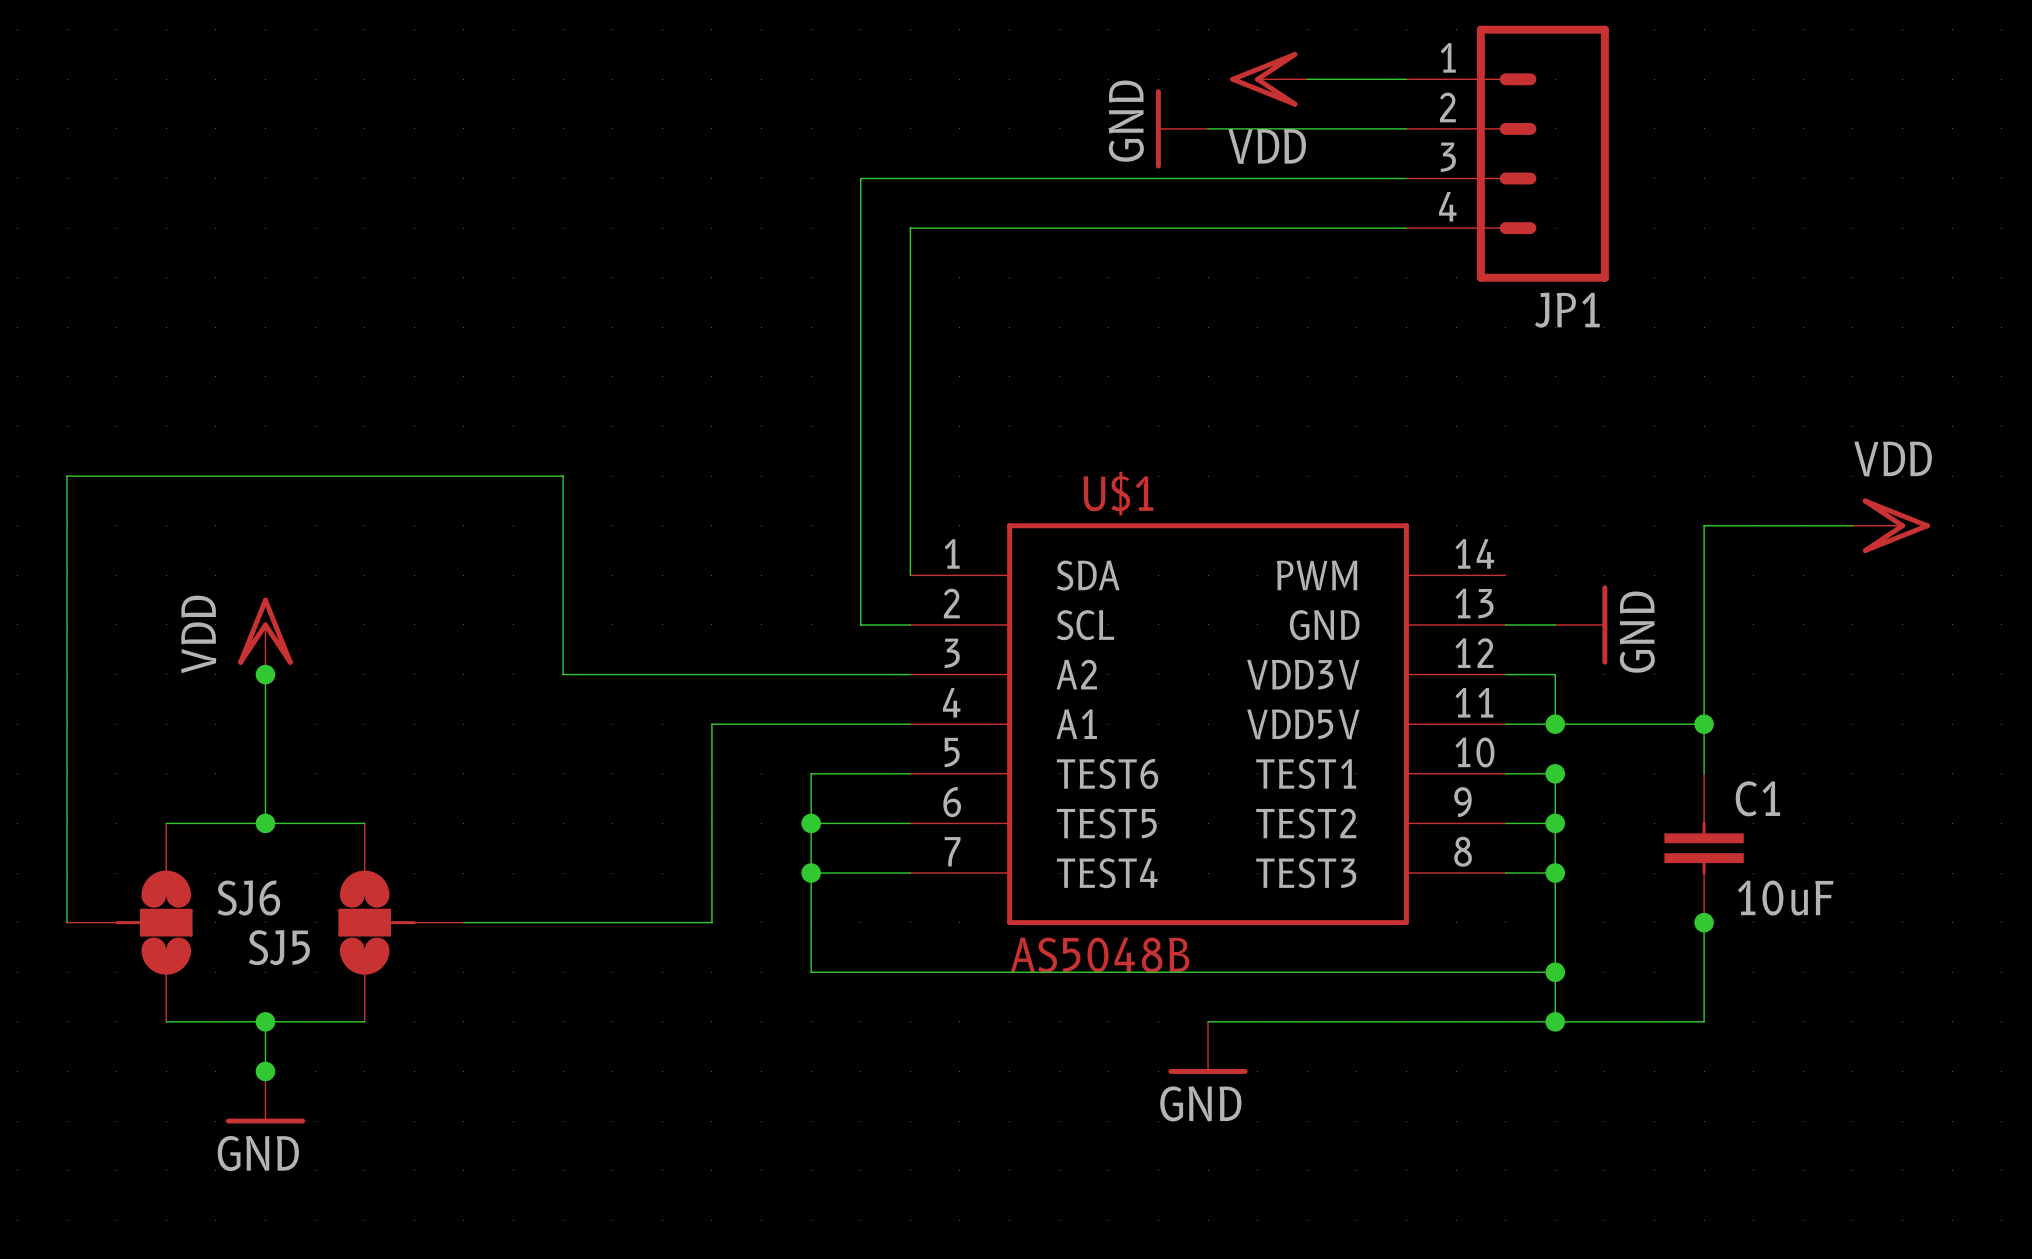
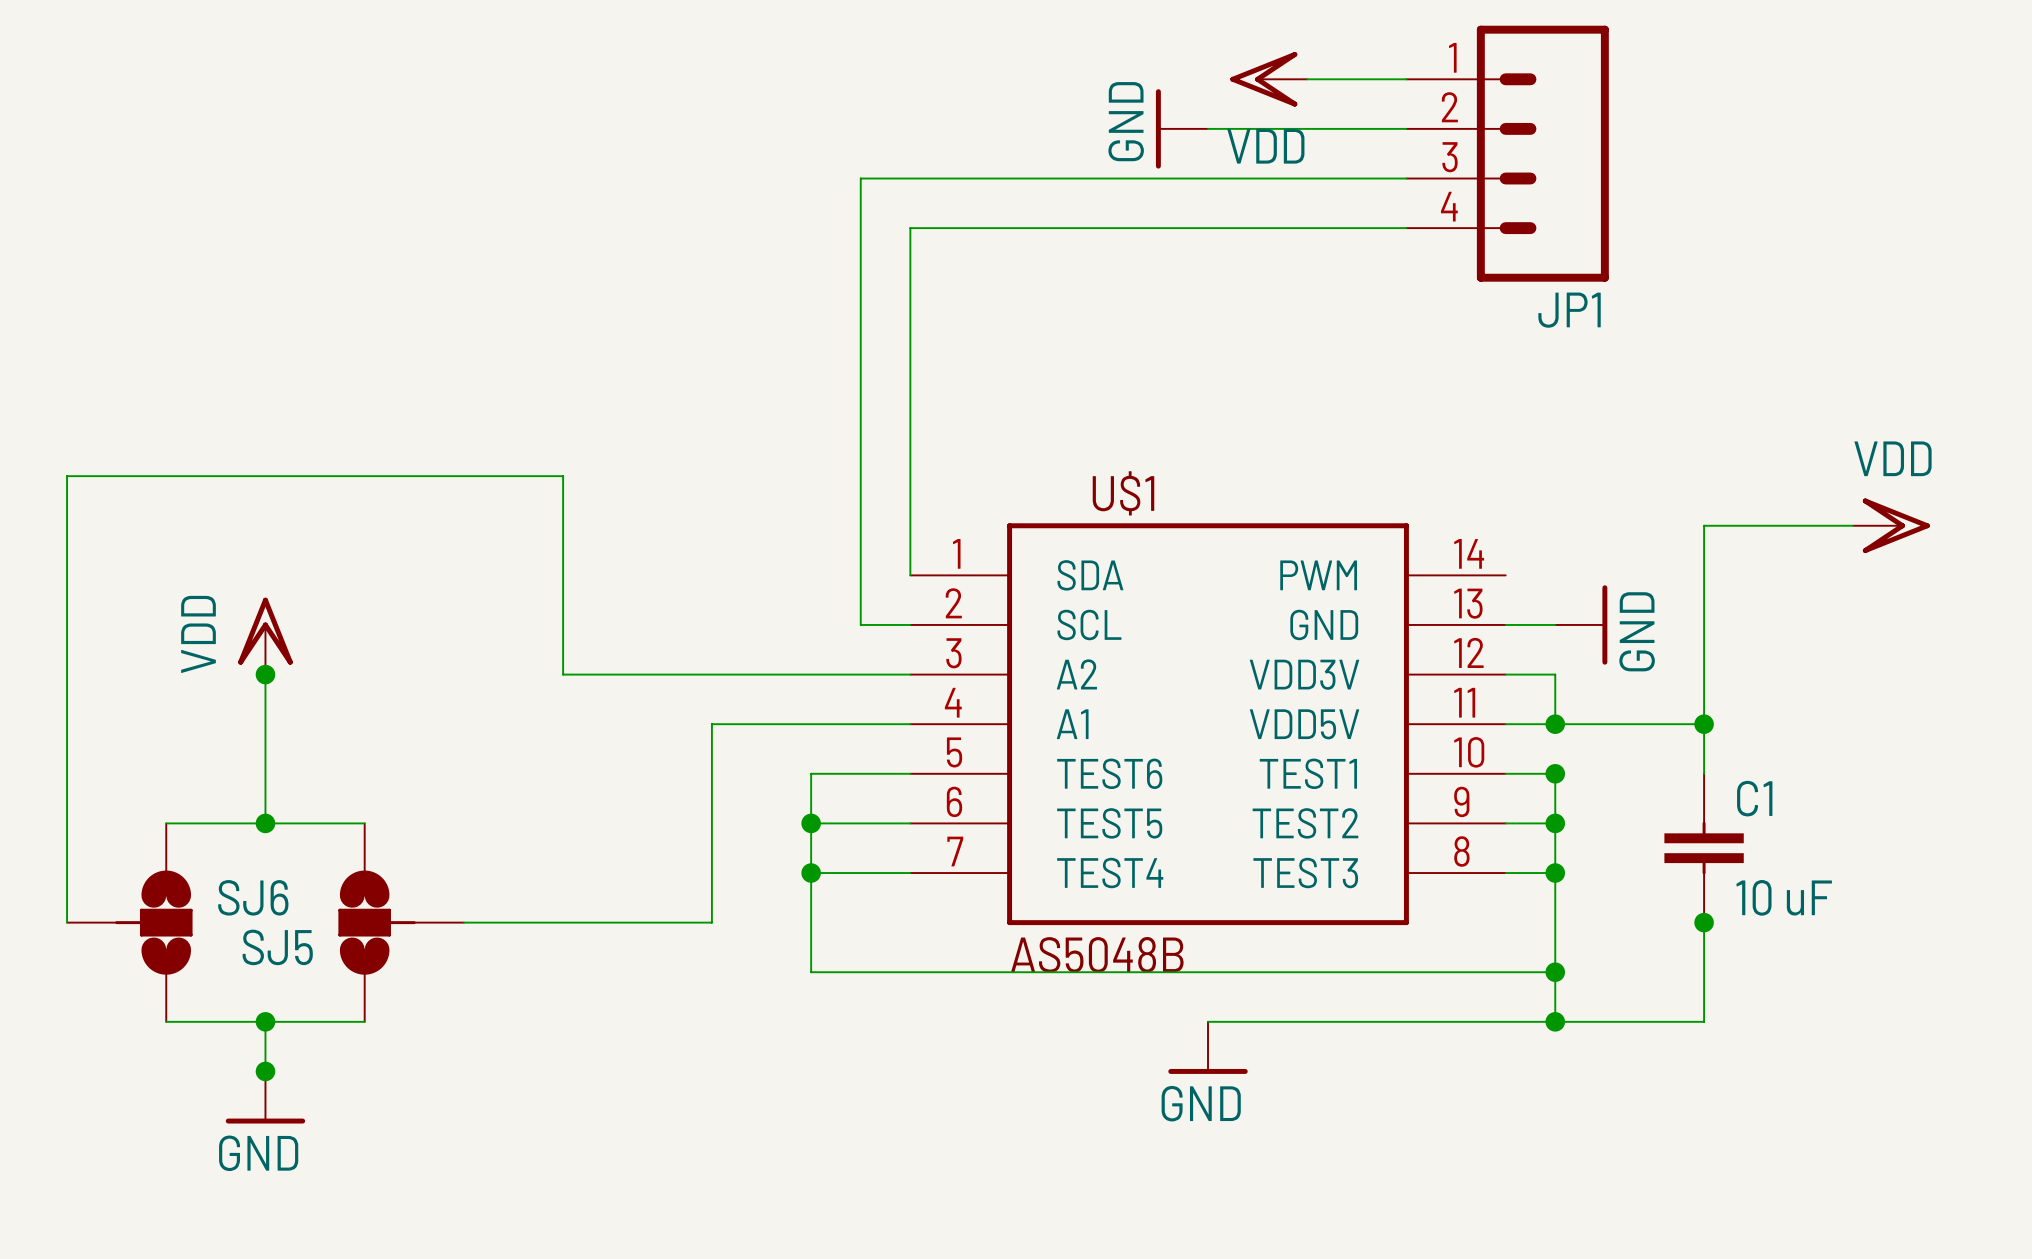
C1 value: 10uF (1785, 898) -> 10 uF (1784, 897)

